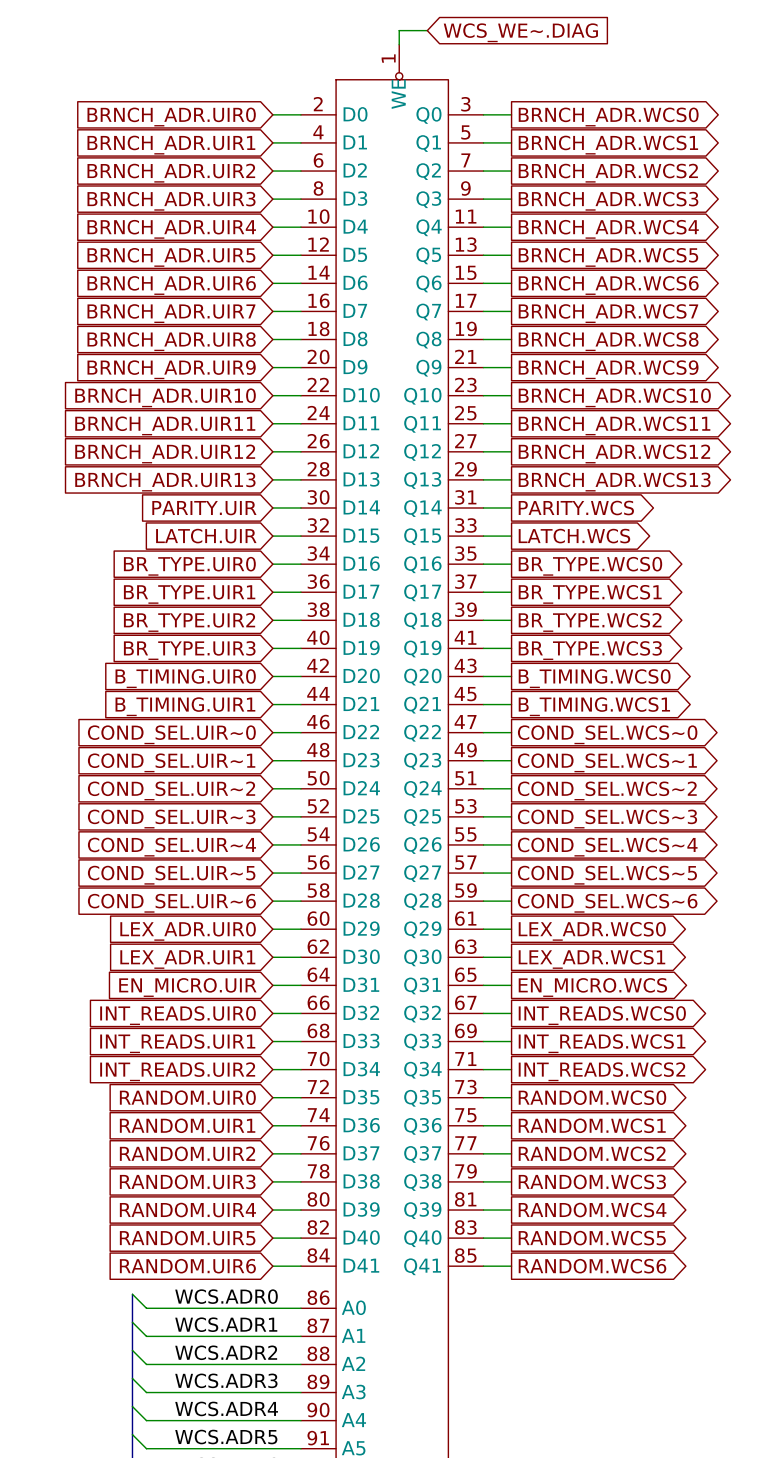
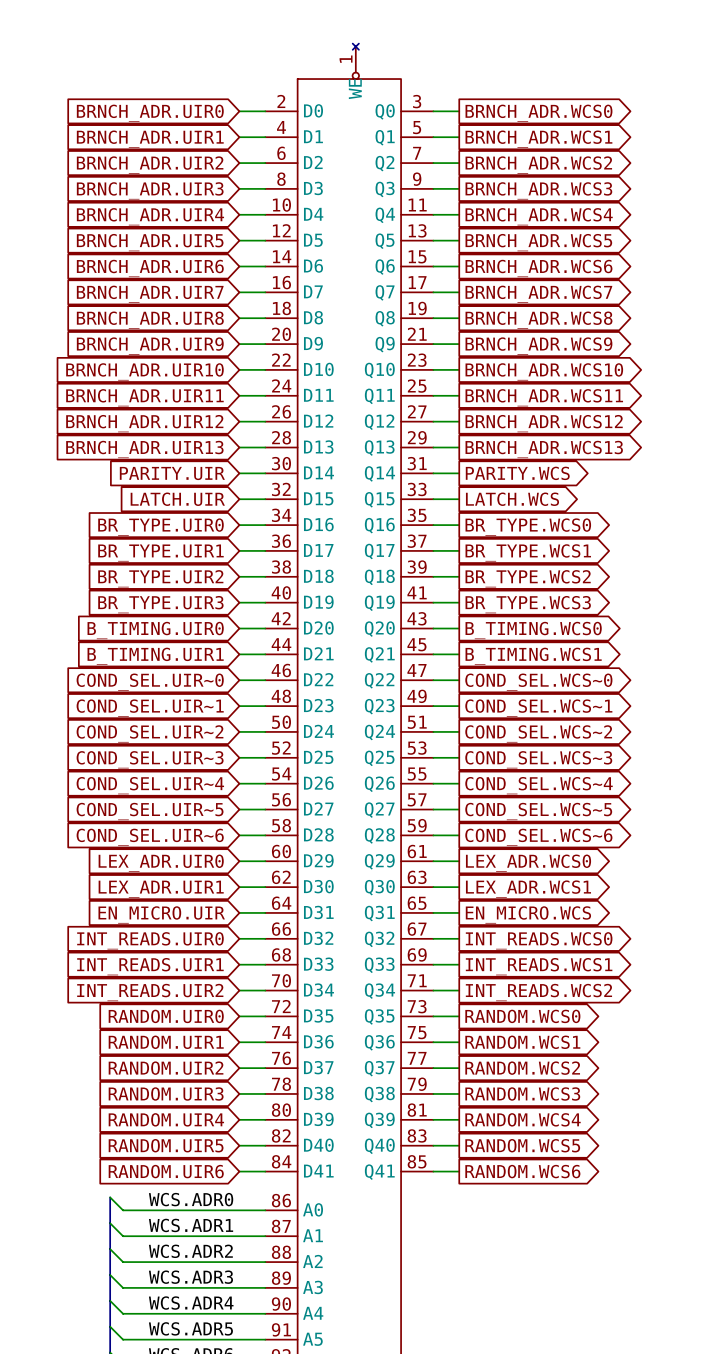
wire: (427, 30) (399, 30) (399, 44) -> none
global label: WCS_WE~.DIAG (520, 32) -> none
no-connect mark: none -> (355, 46)

